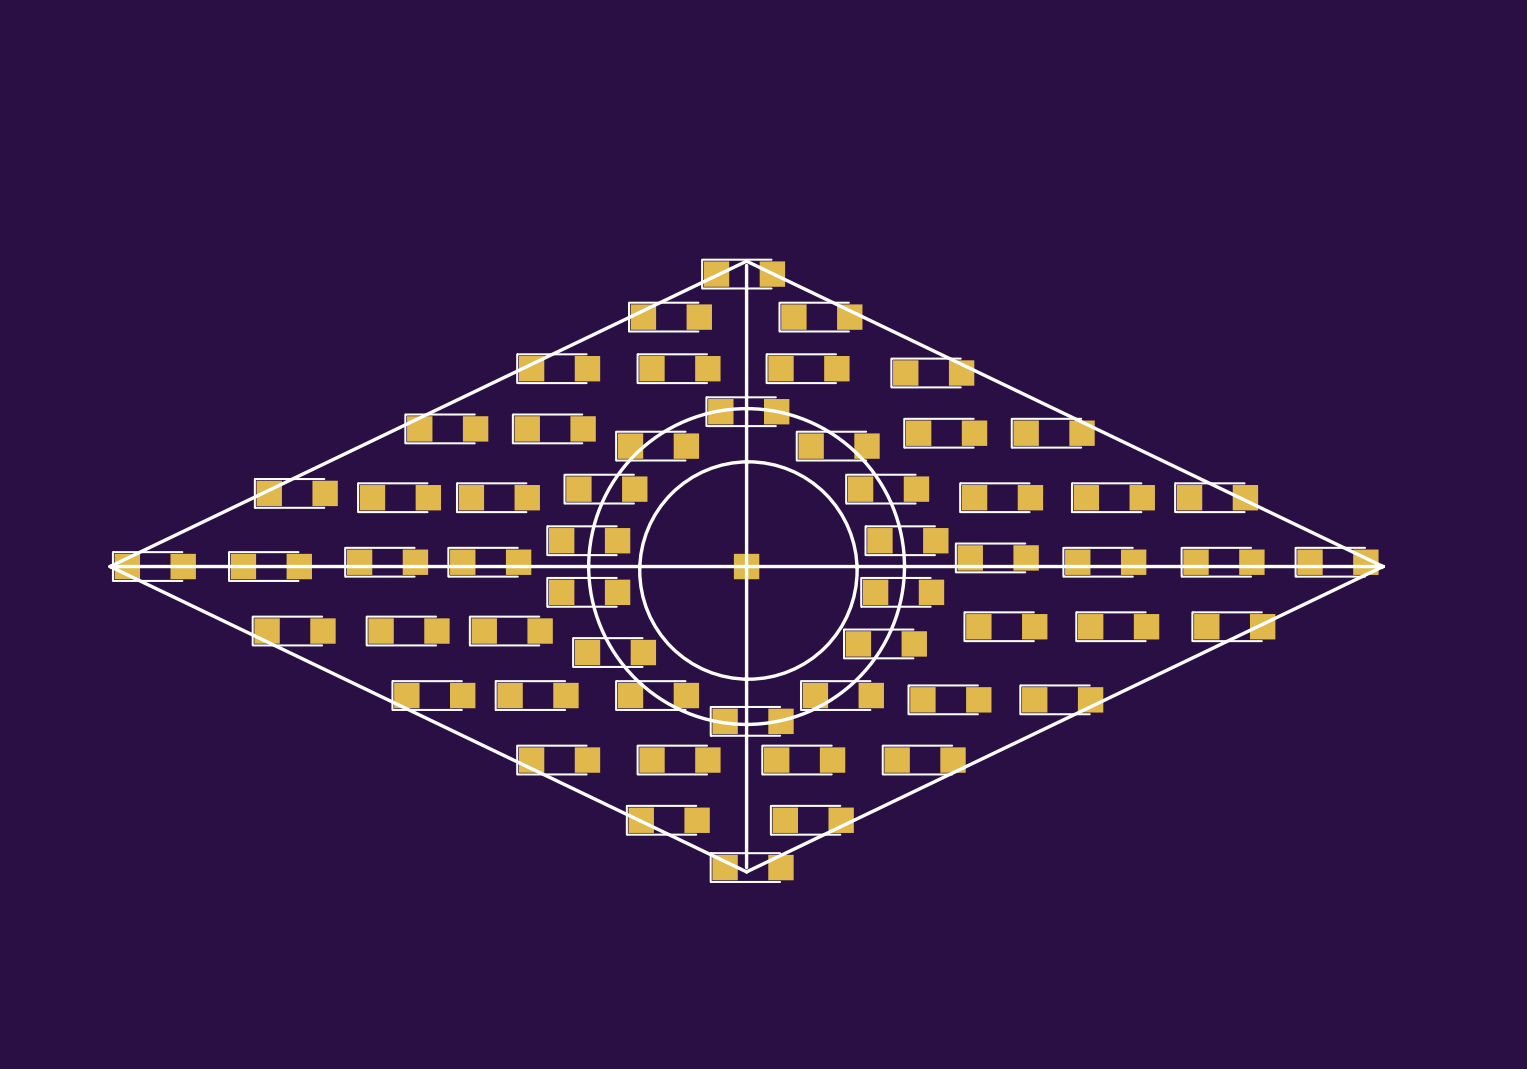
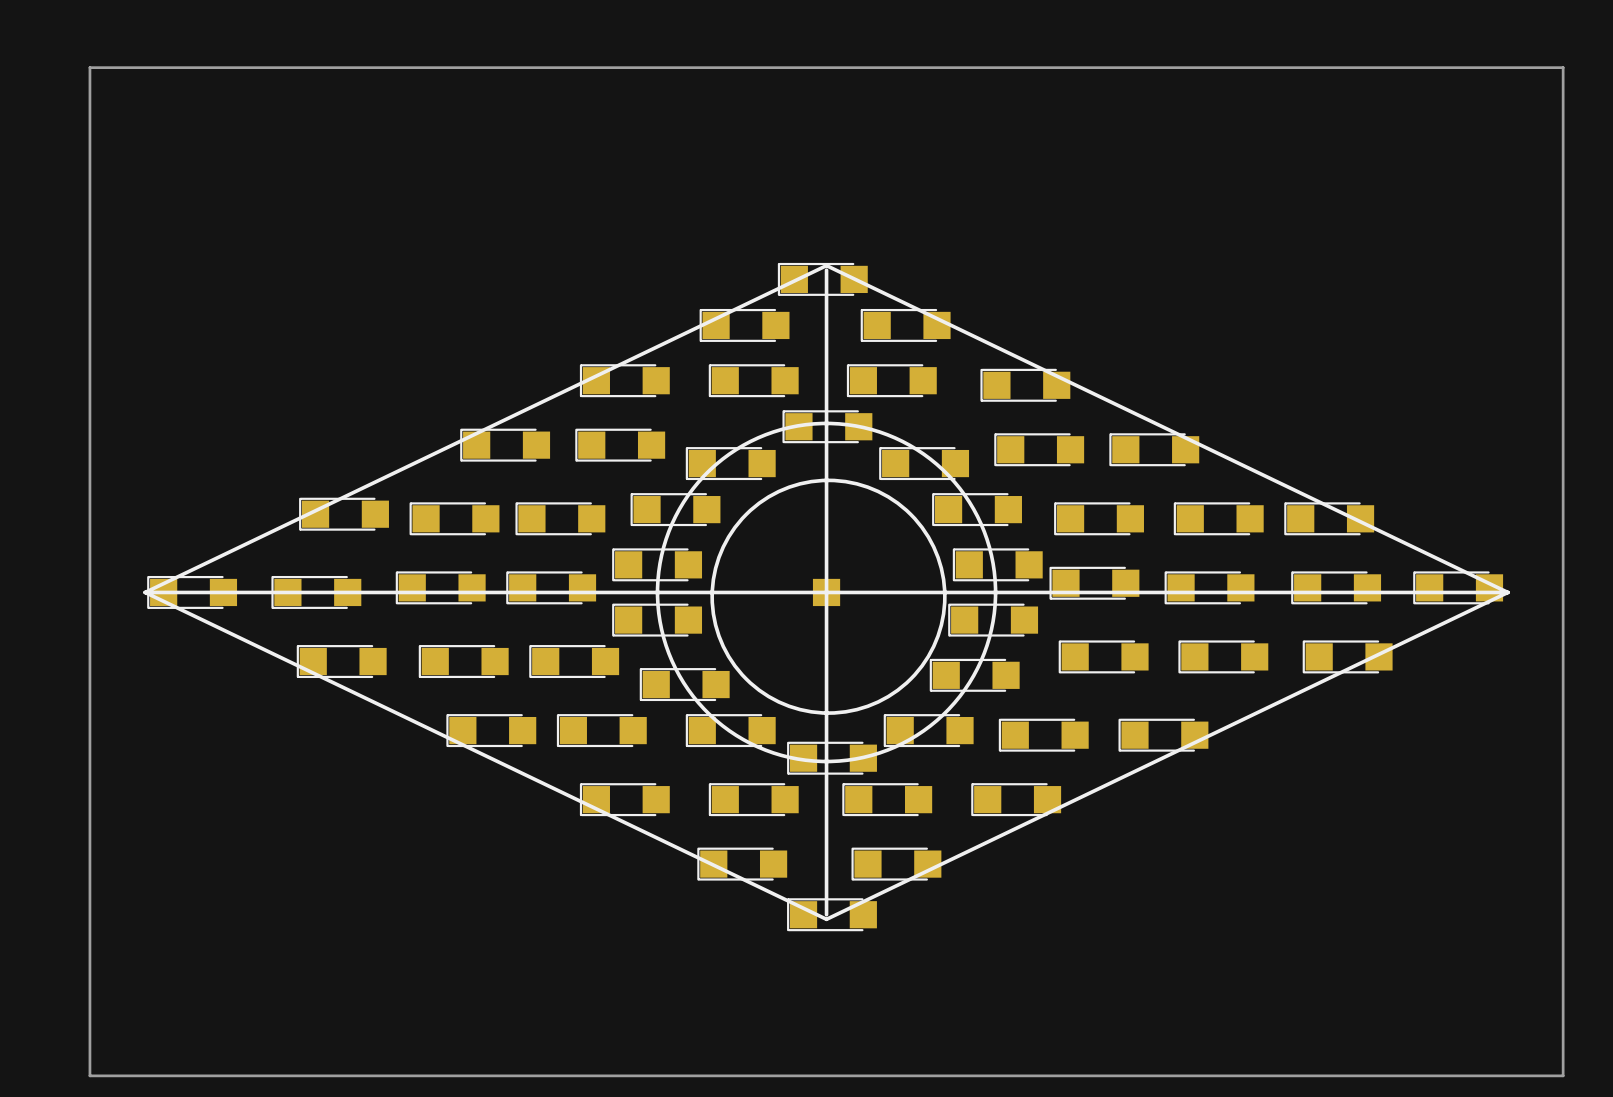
board edge: none -> (89, 67) (89, 1075) (1563, 1075) (1563, 67) (89, 67)

